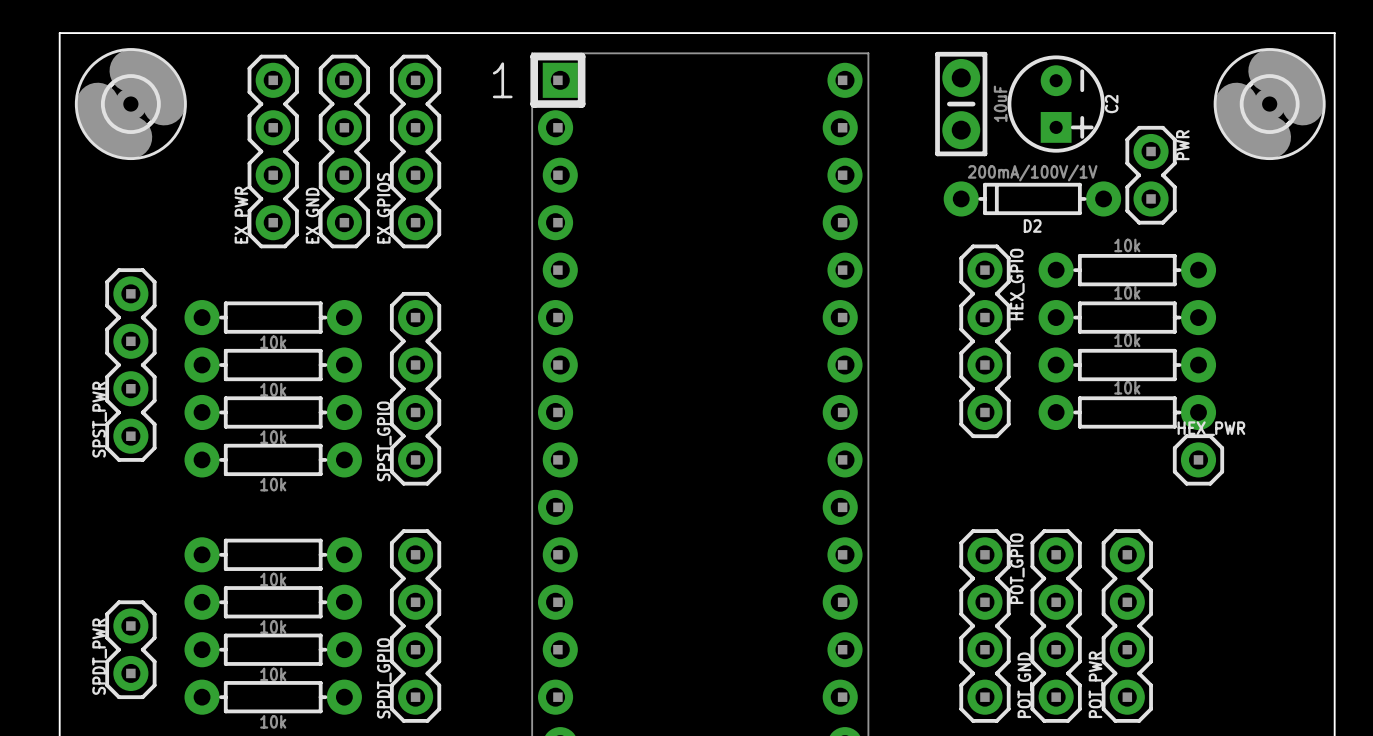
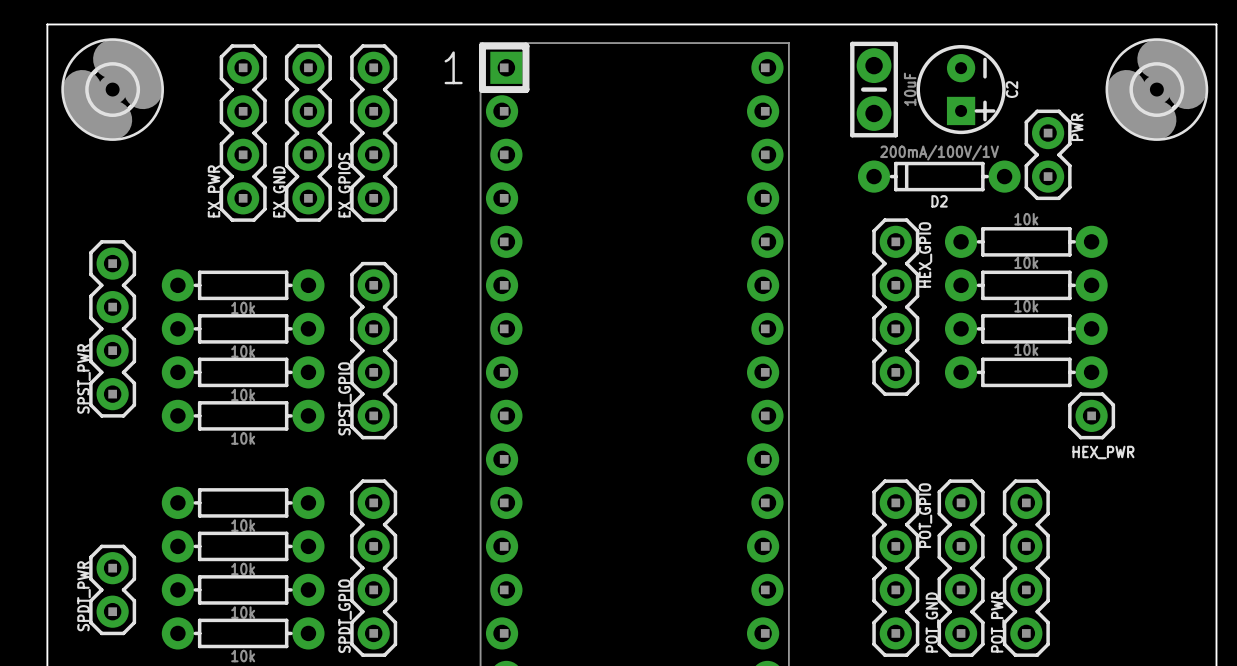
HEX_PWR name position: HEX_PWR (1211, 428) -> HEX_PWR (1103, 452)

